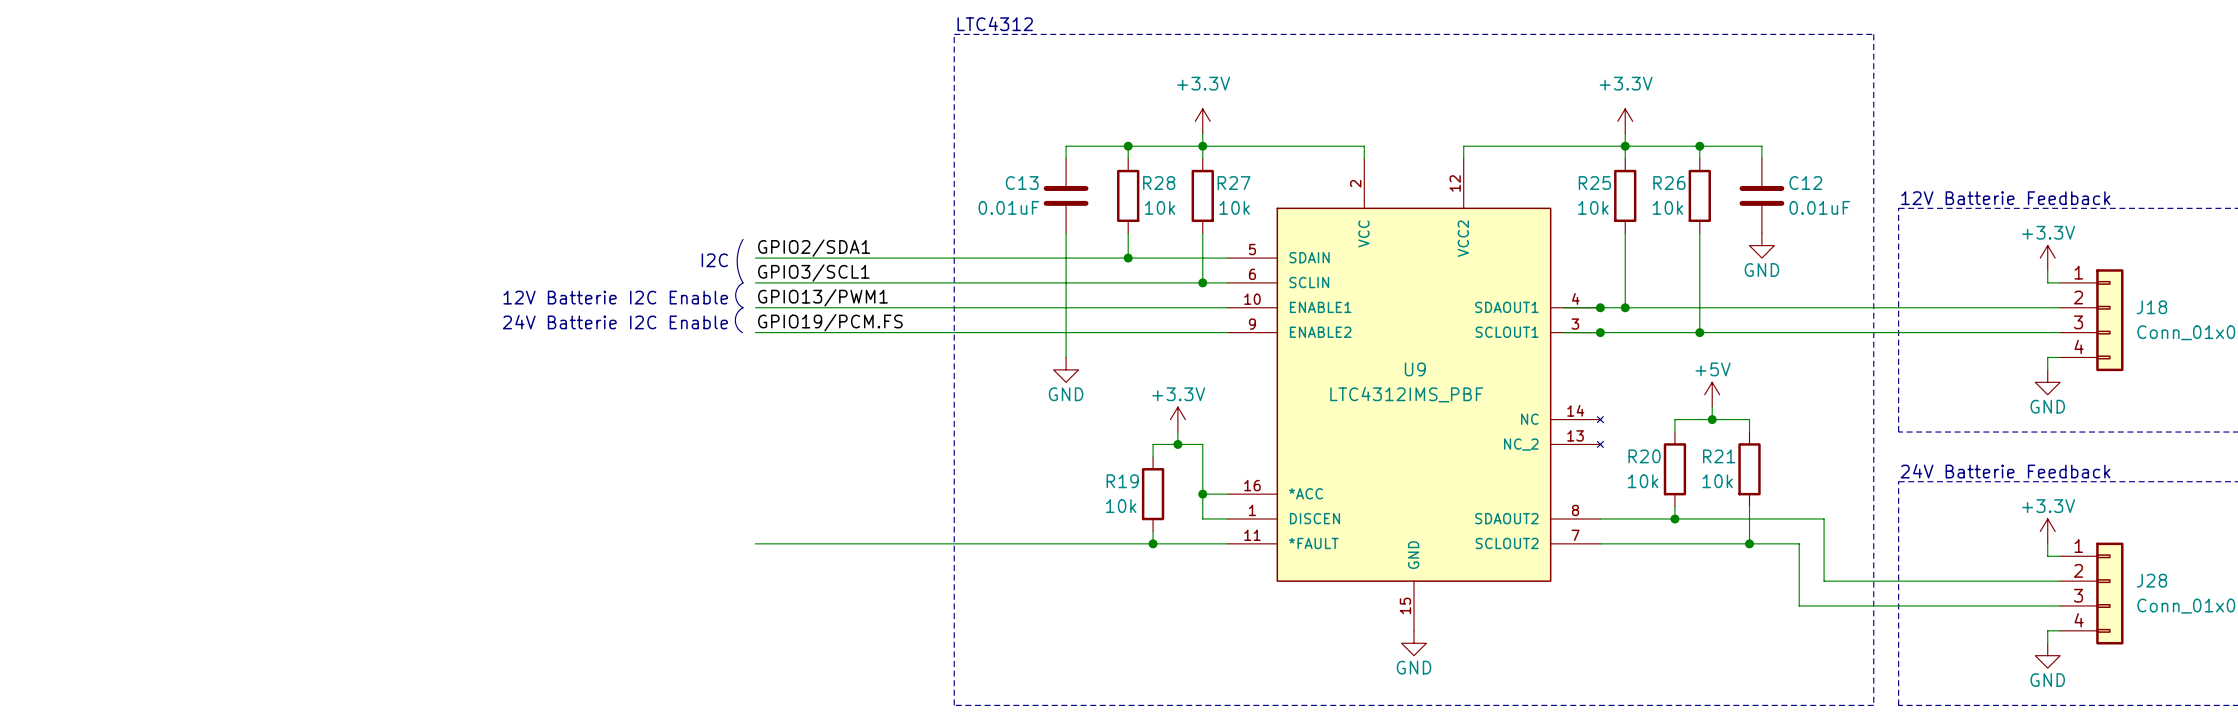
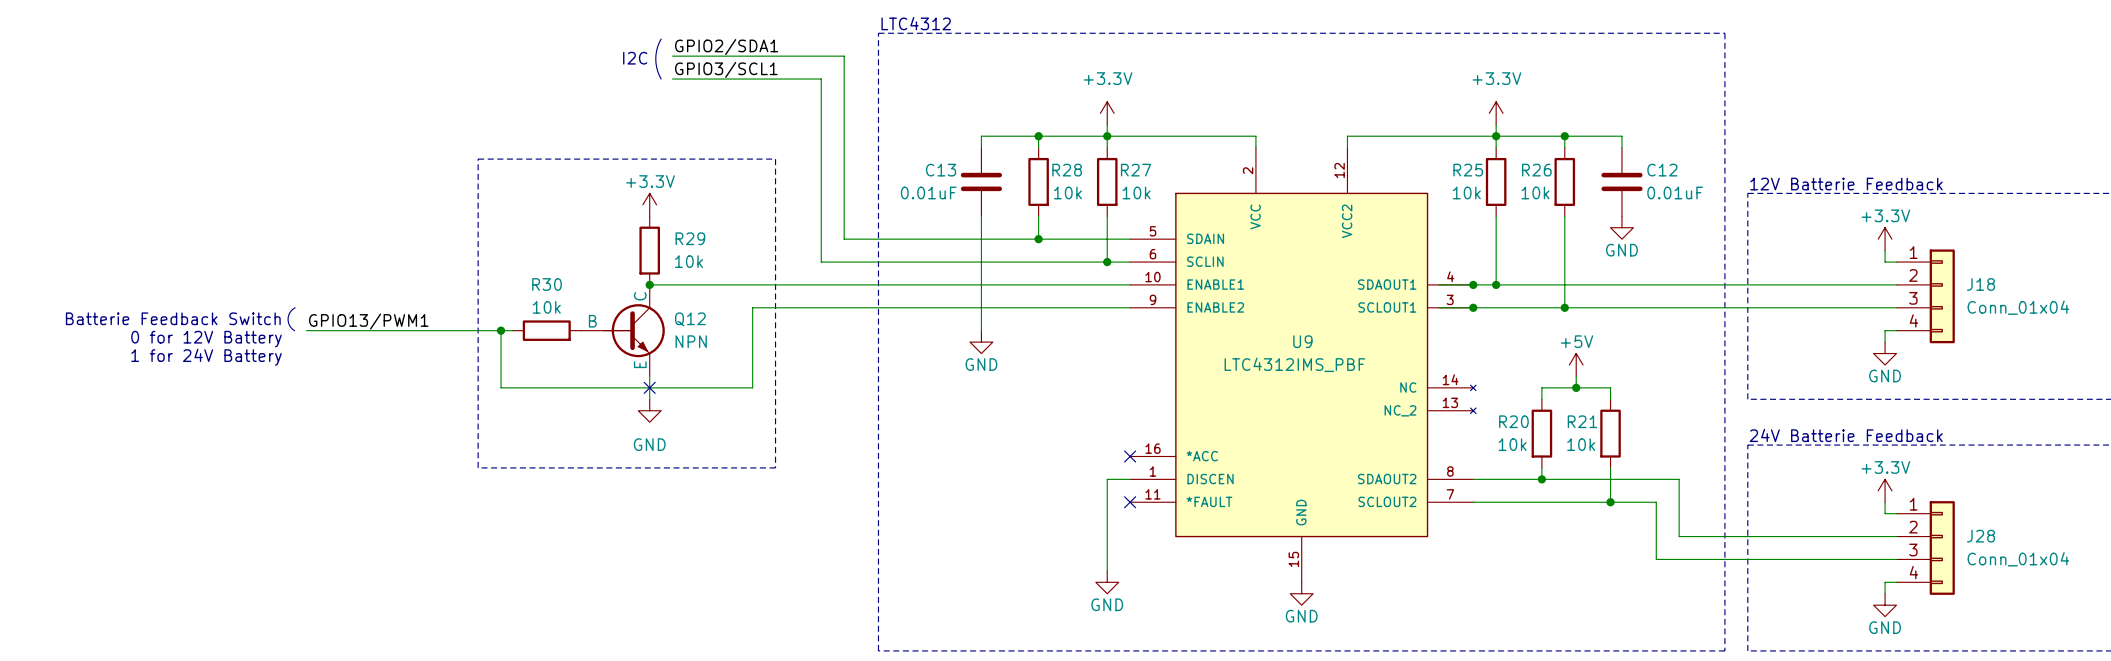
line: none -> (661, 38) (655, 59) (661, 79)
line: none -> (478, 159) (775, 159) (775, 467) (478, 467) (478, 159)
power symbol: none -> +3.3V (649, 204)
line: (743, 239) (737, 261) (743, 282) (738, 287) (735, 295) (738, 303) (743, 307) (737, 312) (735, 320) (736, 326) (742, 332) -> none
label position: GPIO2/SDA1 (814, 248) -> GPIO2/SDA1 (726, 47)
wire: (755, 258) (916, 258) -> (672, 56) (844, 56) (844, 239)
text position: I2C (714, 260) -> I2C (635, 58)
R29: none -> 10k (649, 250)
label position: GPIO3/SCL1 (813, 273) -> GPIO3/SCL1 (726, 69)
wire: (755, 282) (892, 282) -> (672, 79) (821, 79) (821, 262)
text: 12V Batterie I2C Enable (615, 297) -> none
label: GPIO13/PWM1 (822, 297) -> none
wire: none -> (649, 284) (695, 284)
junction: none -> (649, 284)
text: 24V Batterie I2C Enable (615, 322) -> none
label: GPIO19/PCM.FS (830, 322) -> none
line: none -> (295, 307) (290, 311) (288, 319) (289, 325) (294, 330)
wire: (755, 332) (817, 332) -> (501, 330) (501, 387) (752, 387) (752, 307)
text: none -> Batterie Feedback Switch (173, 318)
label: none -> GPIO13/PWM1 (368, 321)
wire: none -> (306, 330) (512, 330)
junction: none -> (501, 330)
R30: none -> 10k (546, 330)
Q12: none -> NPN (622, 330)
text: none -> 0 for 12V Battery (206, 339)
text: none -> 1 for 24V Battery (206, 357)
wire: none -> (649, 376) (649, 399)
no-connect mark: none -> (649, 387)
power symbol: +3.3V (1177, 419) -> none
wire: (1177, 432) (1177, 444) -> none
power symbol: none -> GND (649, 410)
junction: (1177, 444) -> none
wire: (1153, 456) (1153, 444) (1202, 444) (1202, 519) -> (1107, 570) (1107, 479)
R19: 10k (1153, 494) -> none
wire: (1202, 494) (1227, 494) -> none
junction: (1202, 494) -> none
no-connect mark: none -> (1130, 456)
wire: (1153, 531) (1153, 543) -> none
wire: (755, 543) (1227, 543) -> none
junction: (1153, 543) -> none
no-connect mark: none -> (1130, 502)
power symbol: none -> GND (1107, 582)

